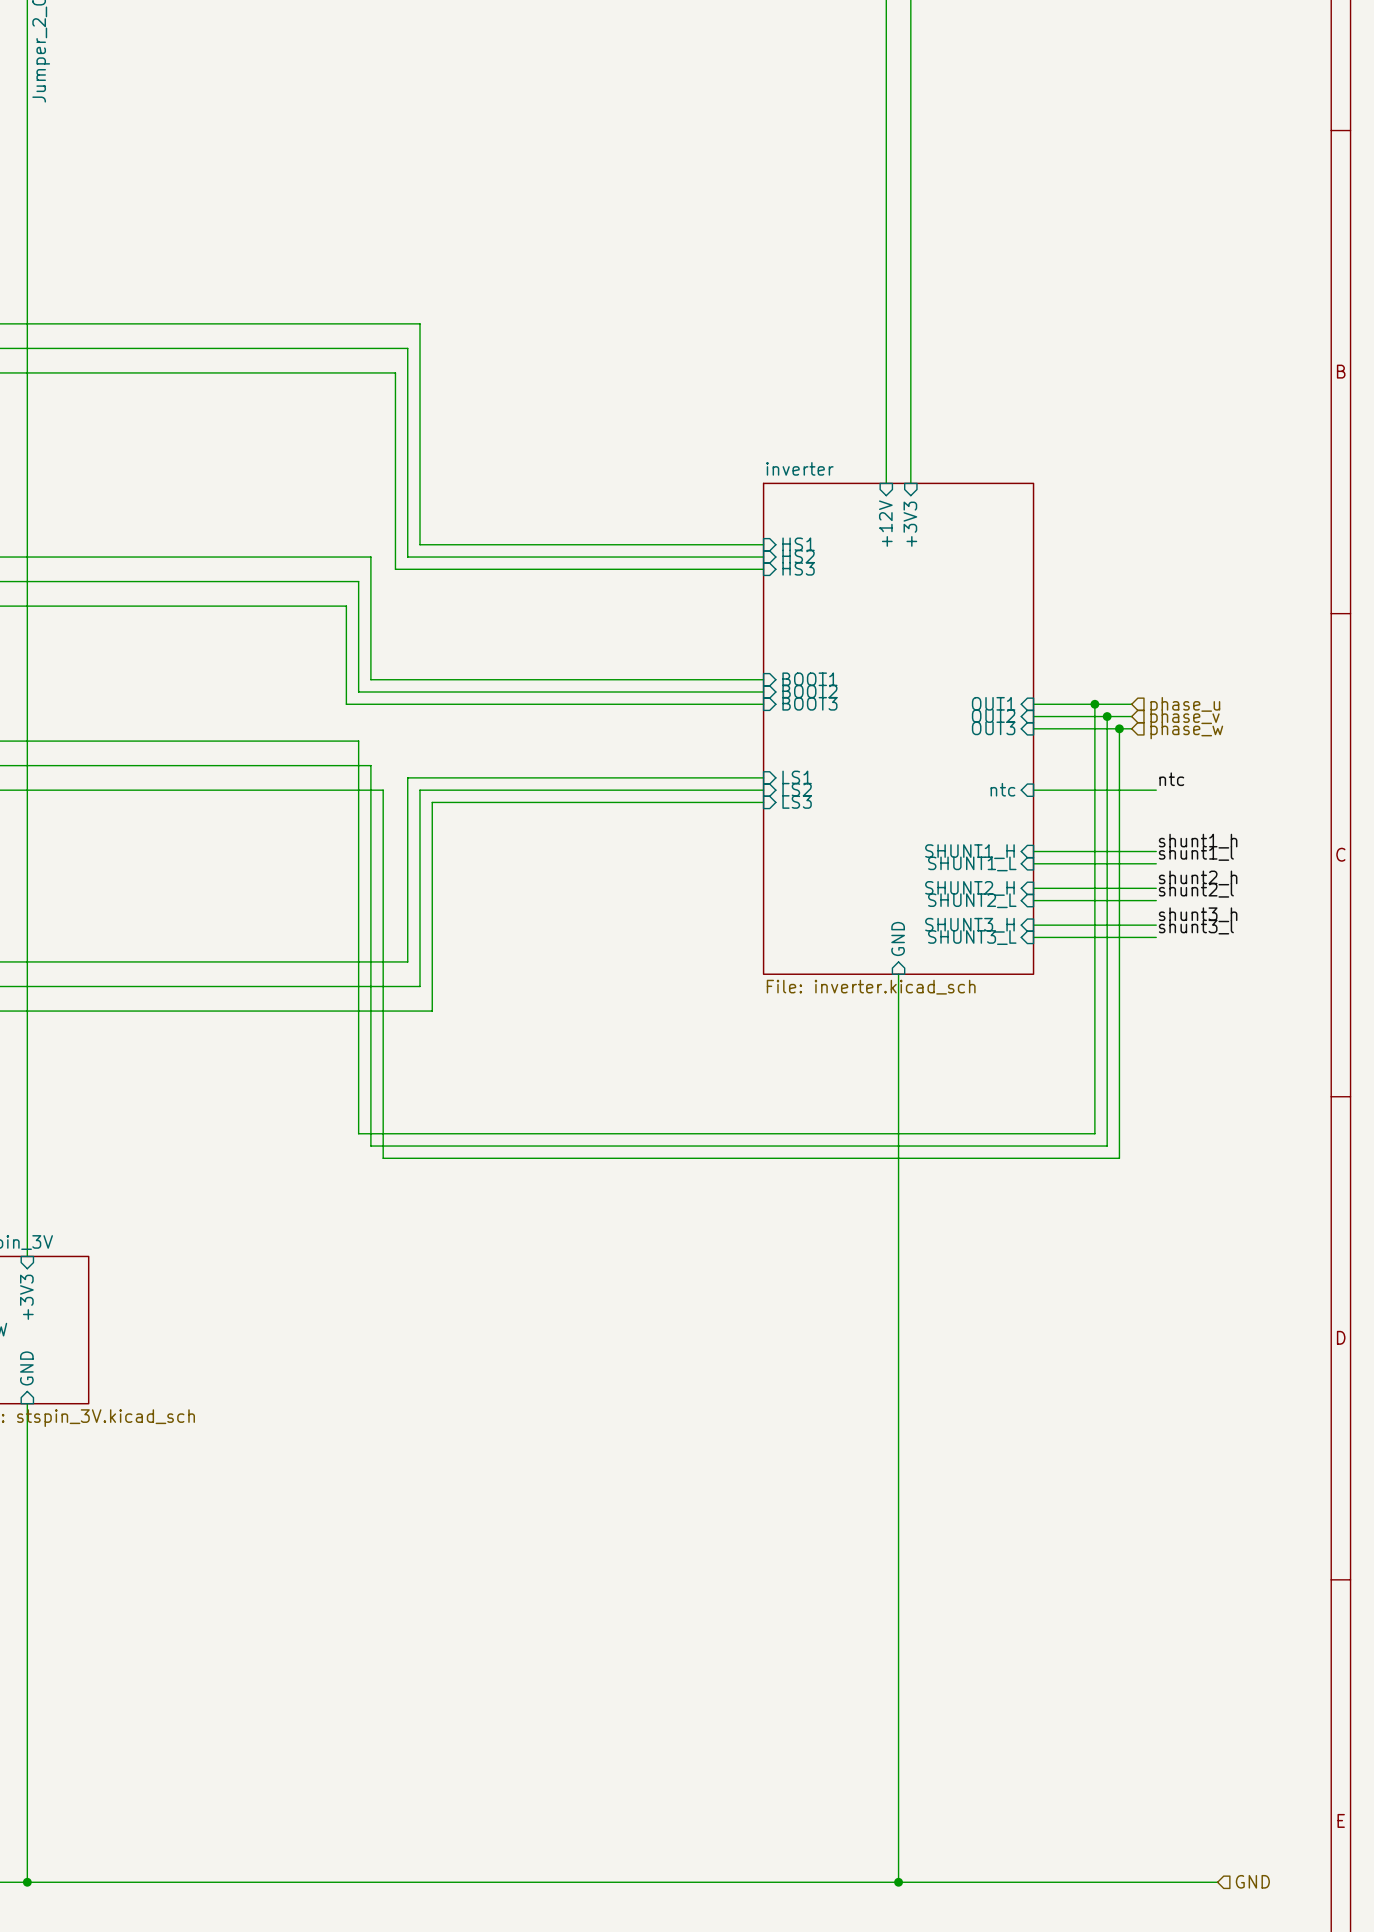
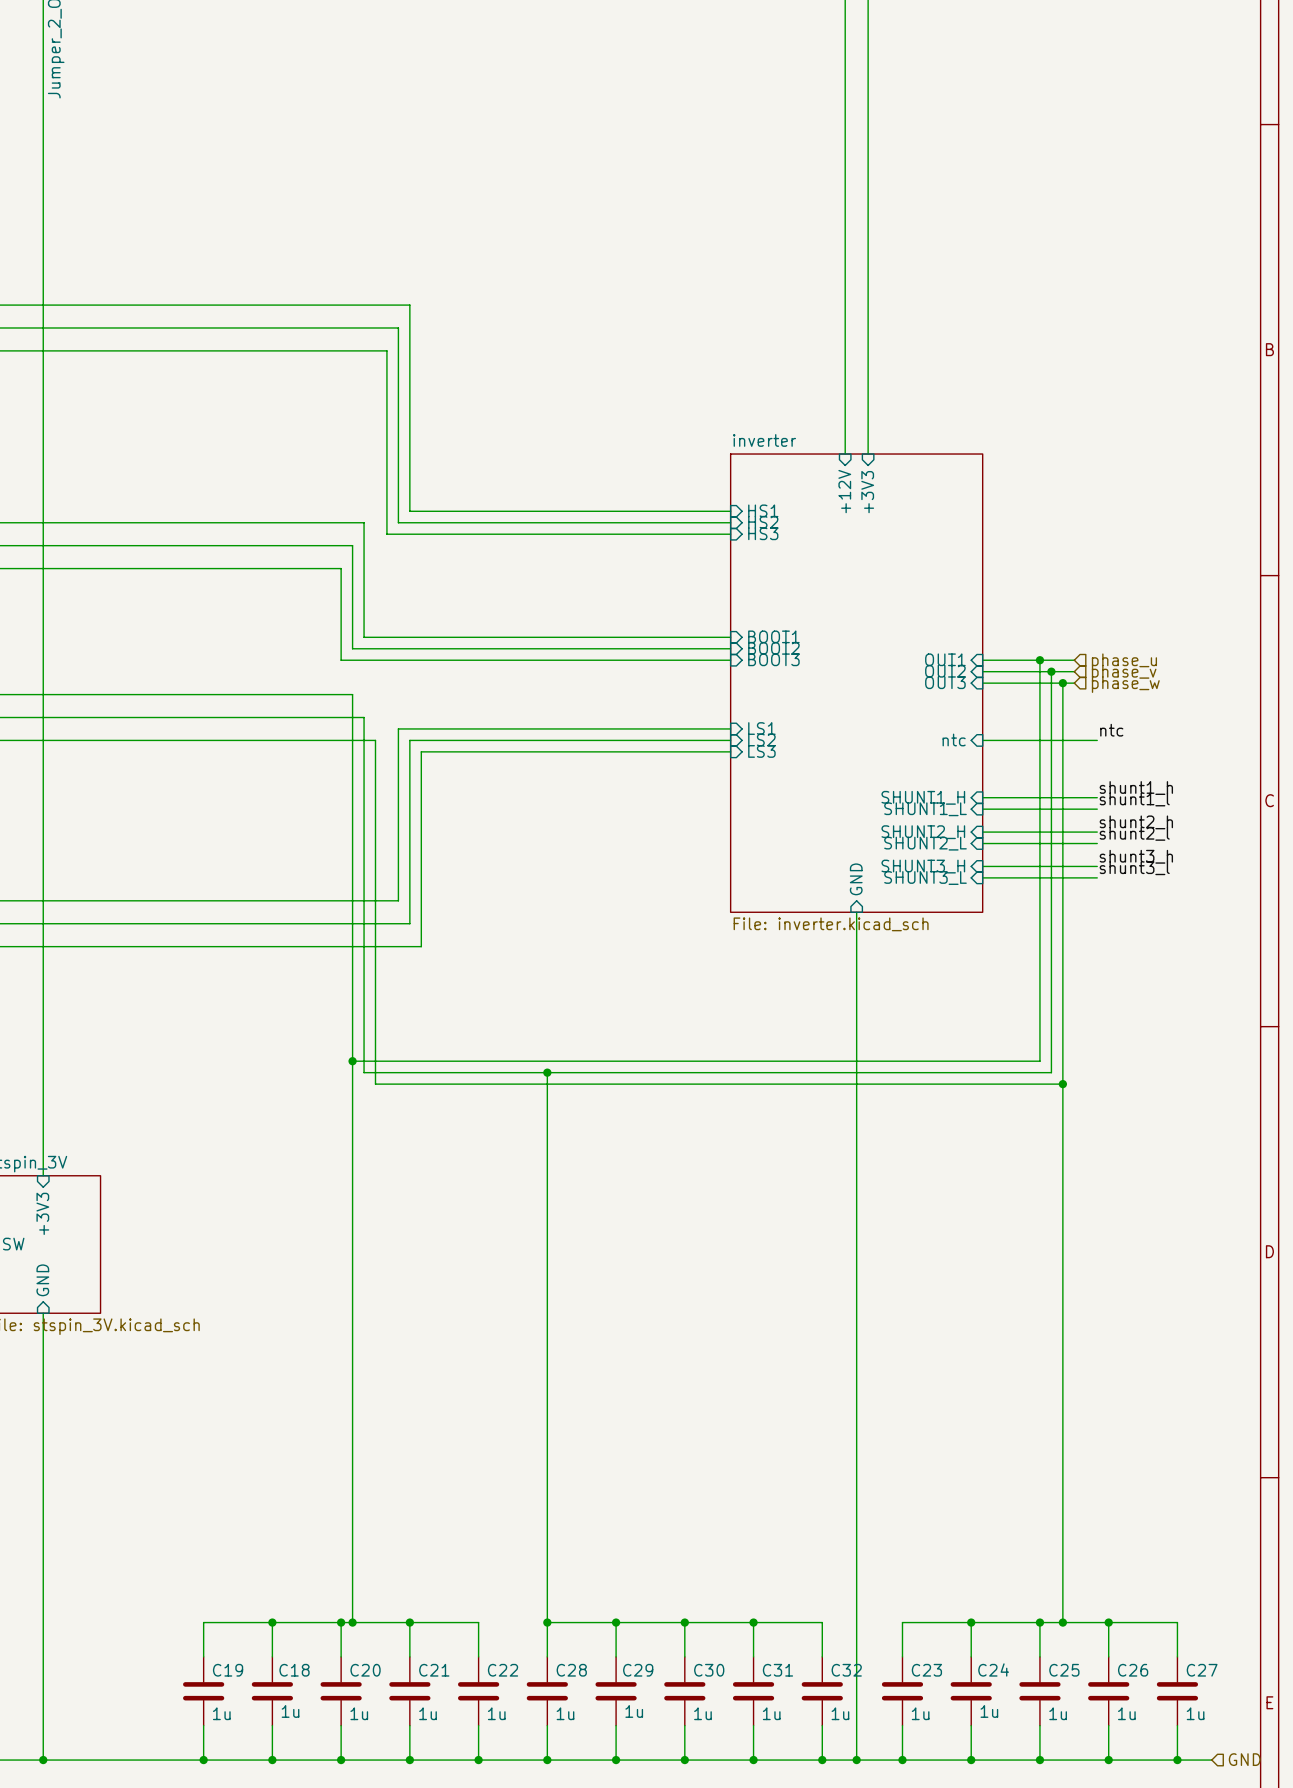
wire: none -> (352, 1061) (352, 1622)
junction: none -> (352, 1061)
wire: none -> (547, 1072) (547, 1656)
junction: none -> (547, 1072)
wire: none -> (1062, 1084) (1062, 1622)
junction: none -> (1062, 1084)
wire: none -> (272, 1622) (272, 1656)
junction: none -> (272, 1622)
wire: none -> (341, 1622) (341, 1656)
junction: none -> (341, 1622)
junction: none -> (352, 1622)
wire: none -> (409, 1622) (409, 1656)
junction: none -> (409, 1622)
wire: none -> (547, 1622) (822, 1622) (822, 1656)
junction: none -> (547, 1622)
wire: none -> (616, 1622) (616, 1656)
junction: none -> (616, 1622)
wire: none -> (684, 1622) (684, 1656)
junction: none -> (684, 1622)
wire: none -> (753, 1622) (753, 1656)
junction: none -> (753, 1622)
wire: none -> (971, 1622) (971, 1656)
junction: none -> (971, 1622)
wire: none -> (1039, 1622) (1039, 1656)
junction: none -> (1039, 1622)
junction: none -> (1062, 1622)
wire: none -> (1108, 1622) (1108, 1656)
junction: none -> (1108, 1622)
wire: none -> (203, 1656) (203, 1622) (478, 1622) (478, 1656)
wire: none -> (902, 1656) (902, 1622) (1177, 1622) (1177, 1656)
C19: none -> 1u (203, 1691)
C18: none -> 1u (272, 1691)
C20: none -> 1u (341, 1691)
C21: none -> 1u (409, 1691)
C22: none -> 1u (478, 1691)
C28: none -> 1u (547, 1691)
C29: none -> 1u (616, 1691)
C30: none -> 1u (684, 1691)
C31: none -> 1u (753, 1691)
C32: none -> 1u (822, 1691)
C23: none -> 1u (902, 1691)
C24: none -> 1u (971, 1691)
C25: none -> 1u (1039, 1691)
C26: none -> 1u (1108, 1691)
C27: none -> 1u (1177, 1691)
wire: none -> (203, 1725) (203, 1760)
wire: none -> (272, 1725) (272, 1760)
wire: none -> (341, 1725) (341, 1760)
wire: none -> (409, 1725) (409, 1760)
wire: none -> (478, 1725) (478, 1760)
wire: none -> (547, 1725) (547, 1760)
wire: none -> (616, 1725) (616, 1760)
wire: none -> (684, 1725) (684, 1760)
wire: none -> (753, 1725) (753, 1760)
wire: none -> (822, 1725) (822, 1760)
wire: none -> (902, 1725) (902, 1760)
wire: none -> (971, 1725) (971, 1760)
wire: none -> (1039, 1725) (1039, 1760)
wire: none -> (1108, 1725) (1108, 1760)
wire: none -> (1177, 1725) (1177, 1760)
hierarchical label position: GND (1252, 1881) -> GND (1244, 1759)
junction: none -> (203, 1760)
junction: none -> (272, 1760)
junction: none -> (341, 1760)
junction: none -> (409, 1760)
junction: none -> (478, 1760)
junction: none -> (547, 1760)
junction: none -> (616, 1760)
junction: none -> (684, 1760)
junction: none -> (753, 1760)
junction: none -> (822, 1760)
junction: none -> (902, 1760)
junction: none -> (971, 1760)
junction: none -> (1039, 1760)
junction: none -> (1108, 1760)
wire: none -> (1154, 1760) (1211, 1760)
junction: none -> (1177, 1760)

